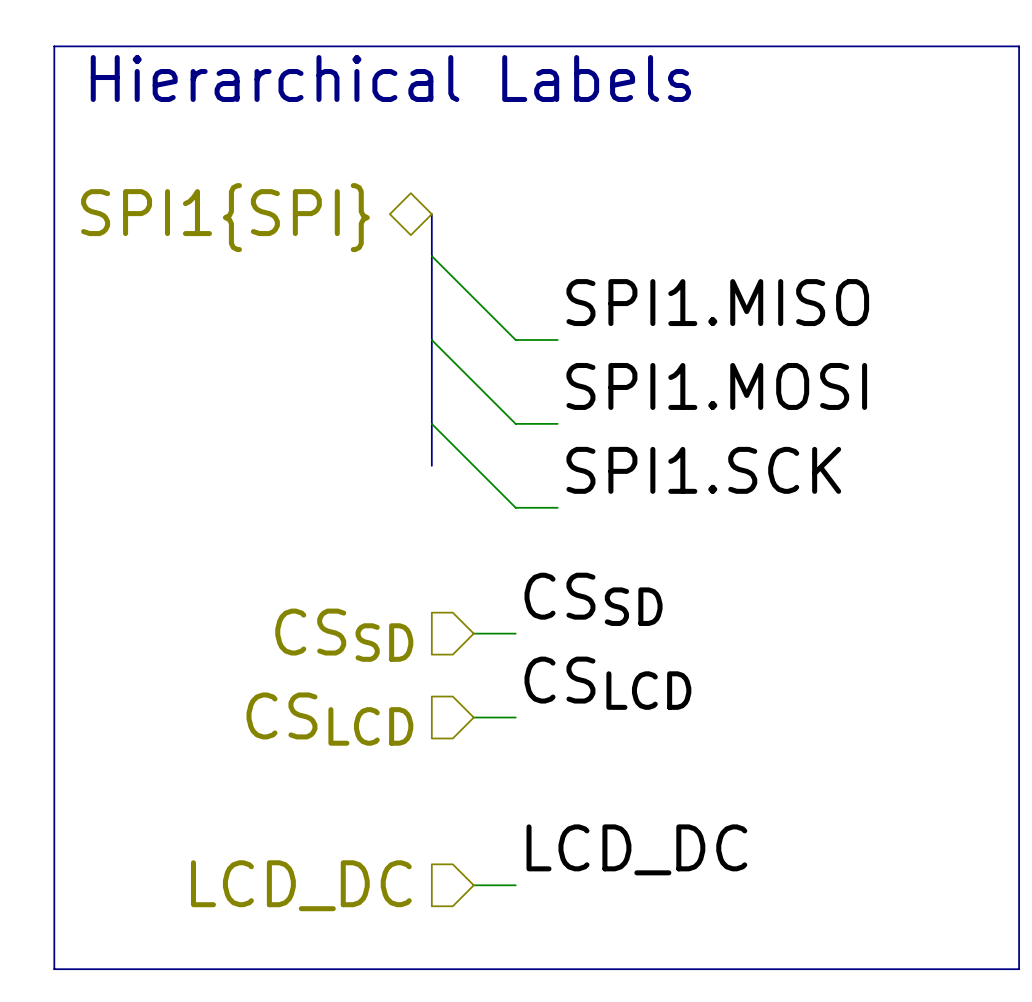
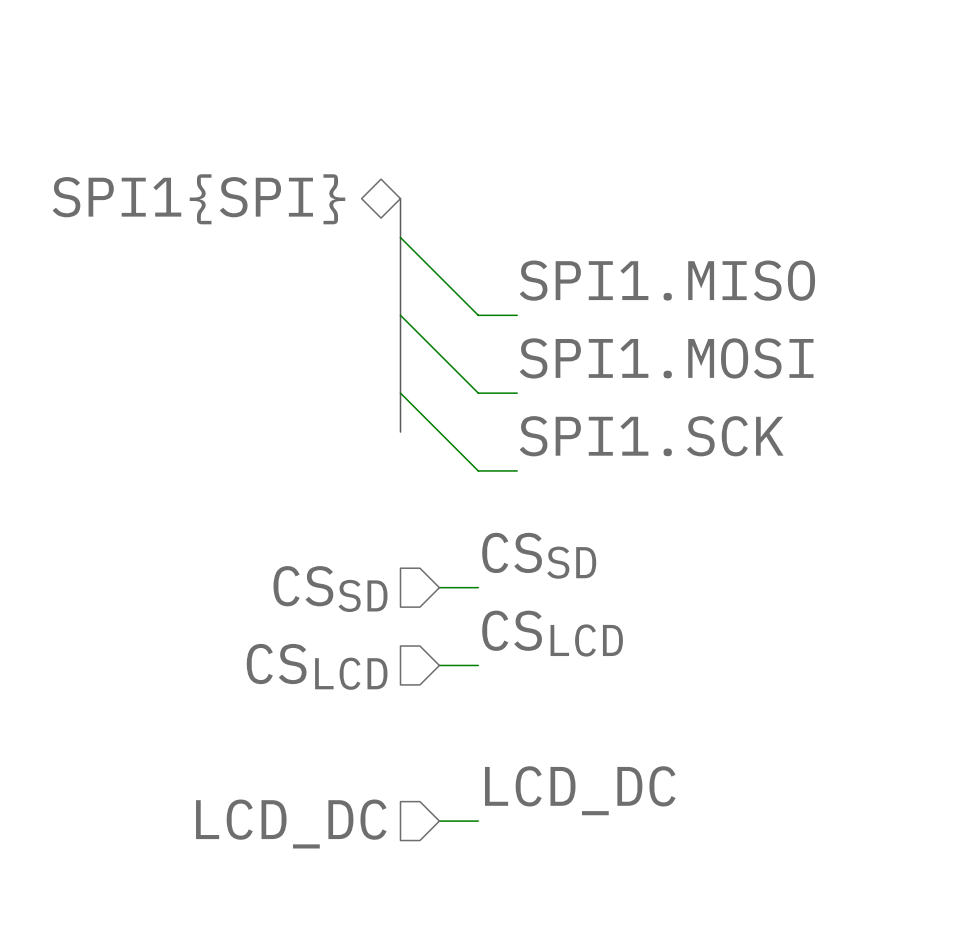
line: (54, 46) (1019, 46) (1019, 969) (54, 969) (54, 46) -> none
text: Hierarchical Labels (390, 78) -> none

